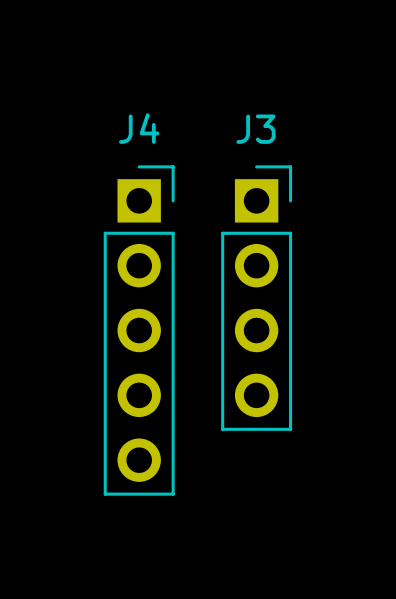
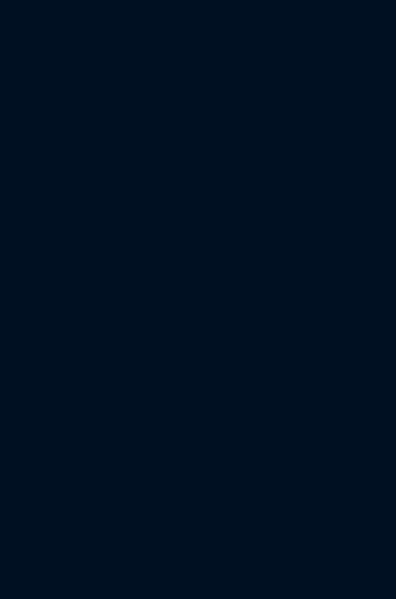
J3: (256, 298) -> none
J4: (139, 330) -> none

